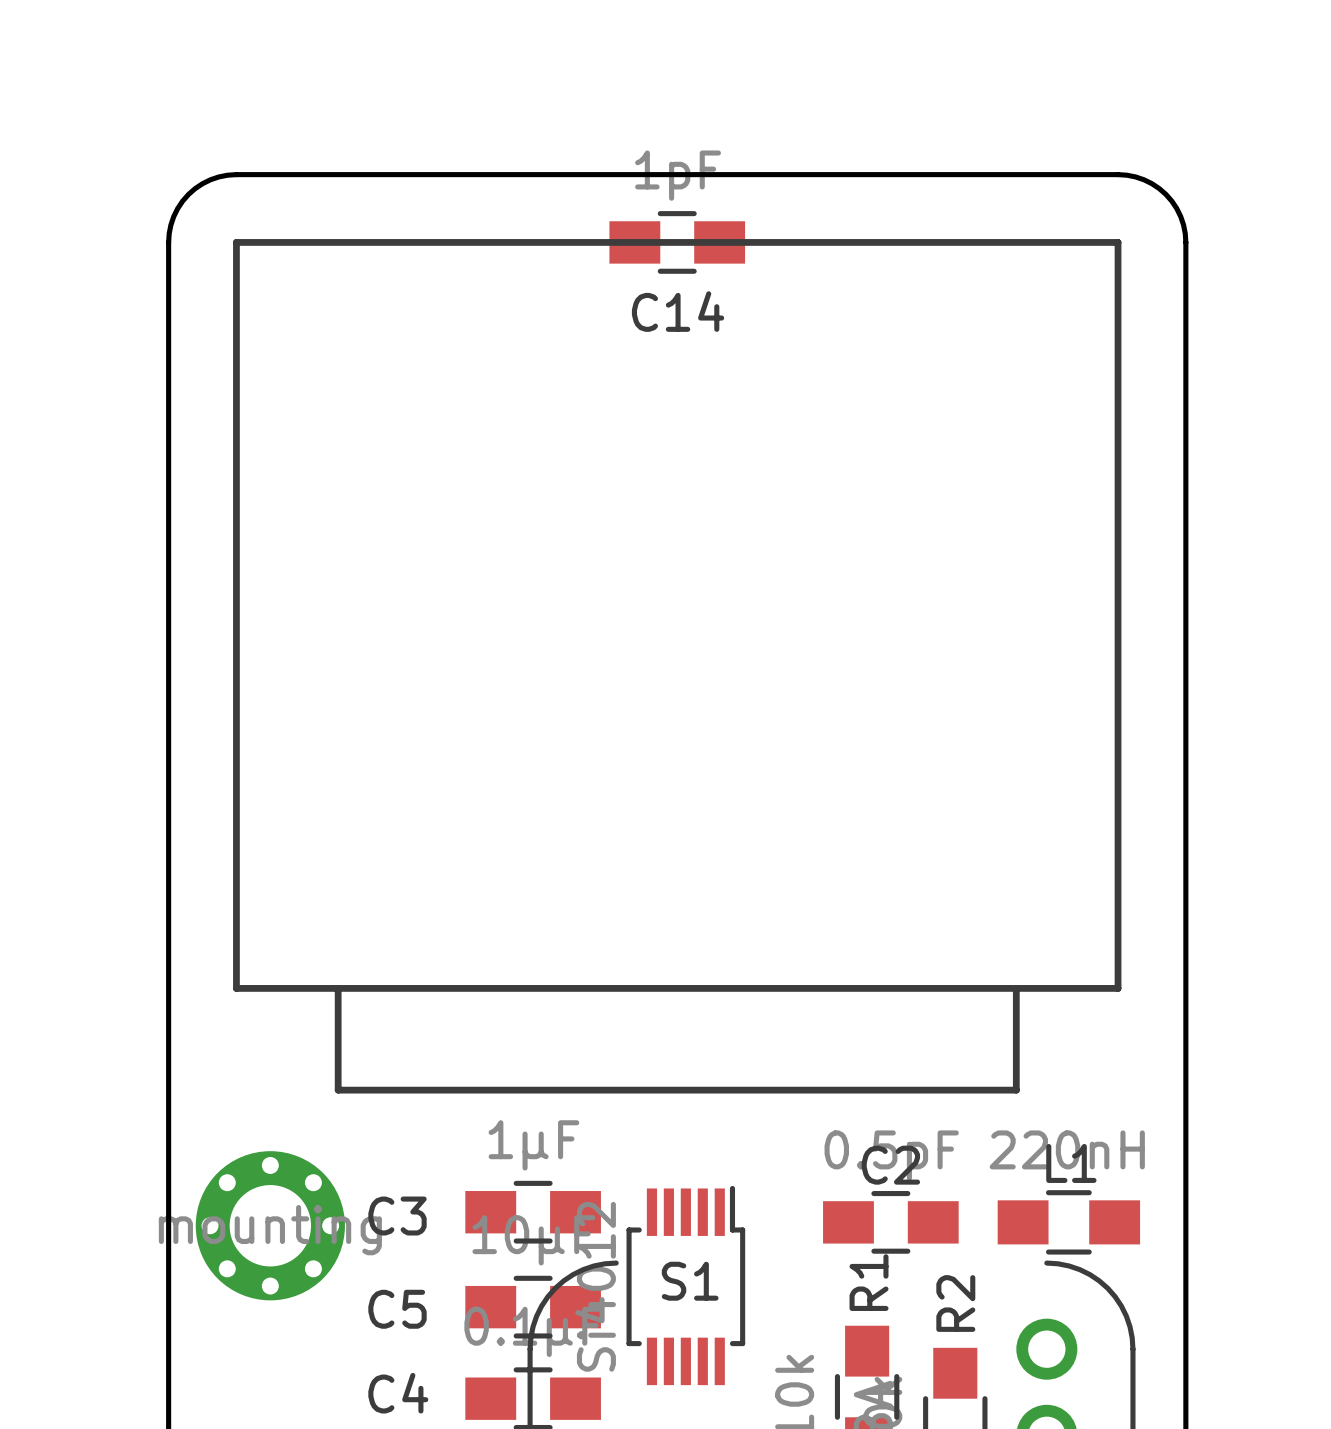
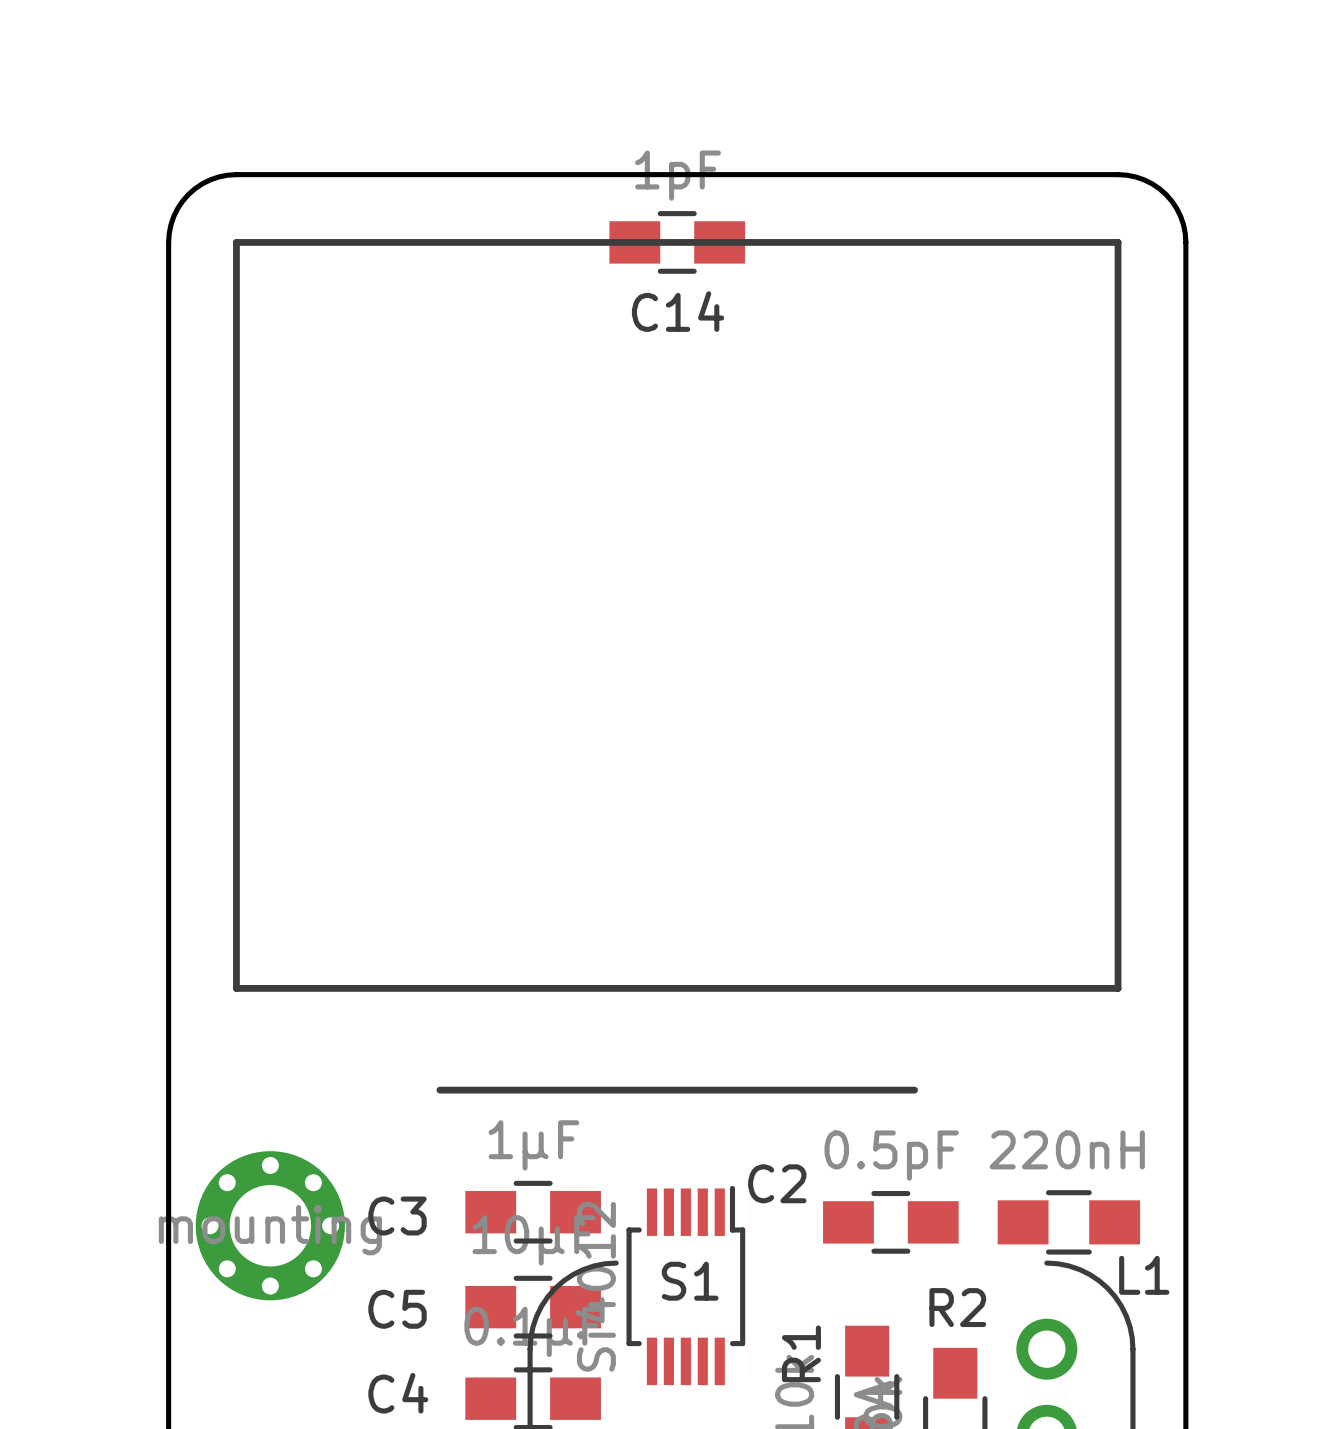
line: (338, 988) (338, 1090) (439, 1090) -> none
line: (1016, 988) (1016, 1090) (914, 1090) -> none
L1 name position: L1 (1071, 1163) -> L1 (1144, 1275)
C2 name position: C2 (890, 1165) -> C2 (777, 1183)
R1 name position: R1 (869, 1282) -> R1 (801, 1353)
R2 name rotation: 0° (955, 1303) -> 90° clockwise (957, 1307)

